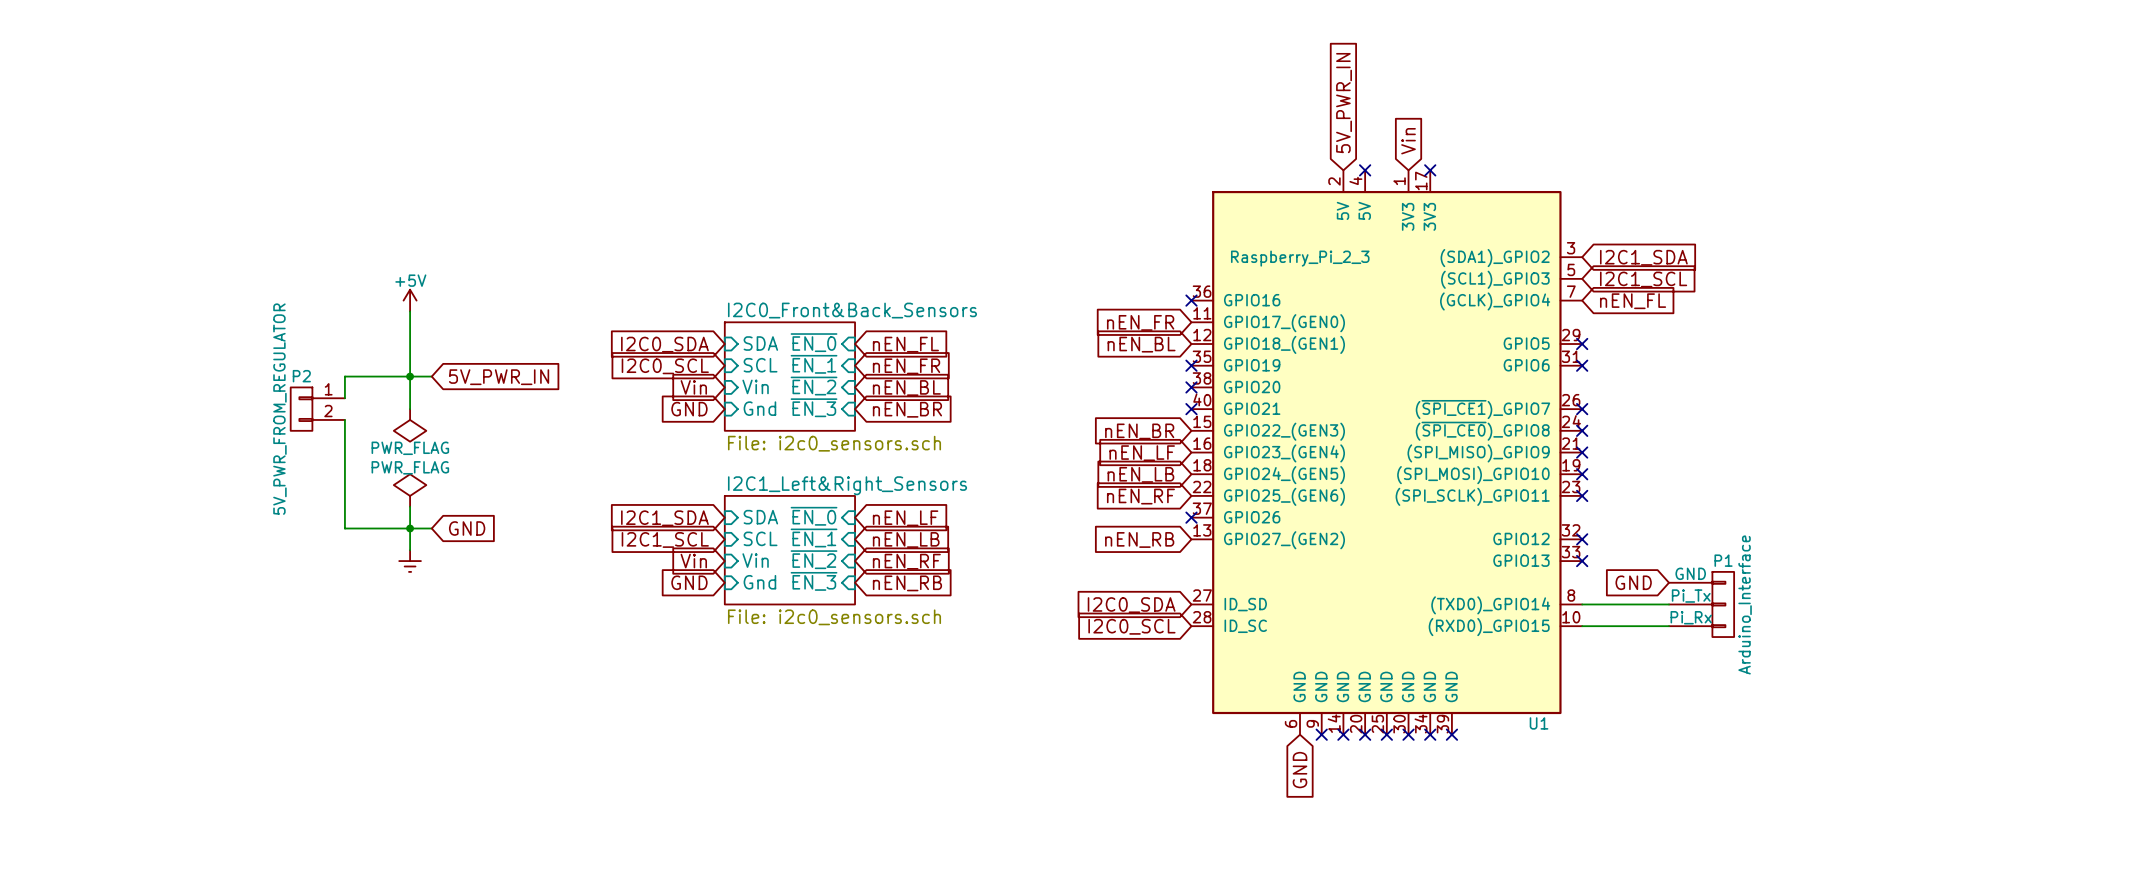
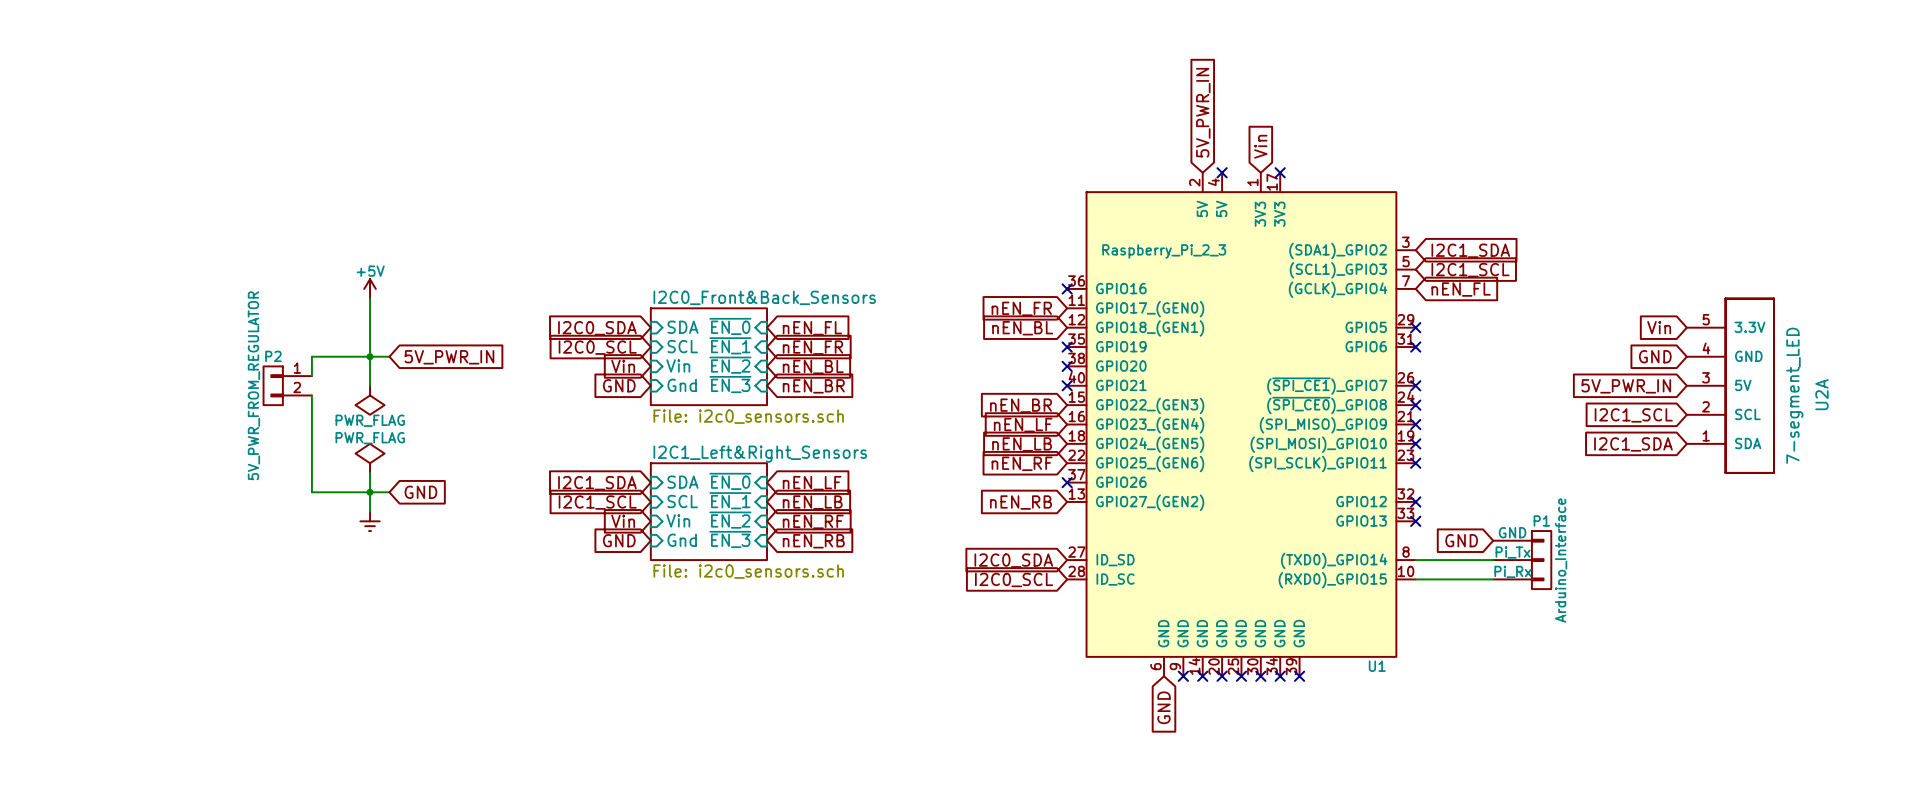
global label: none -> Vin (1659, 327)
global label: none -> GND (1655, 356)
global label: none -> 5V_PWR_IN (1626, 386)
U2A: none -> 7-segment_LED (1730, 385)
global label: none -> I2C1_SCL (1633, 415)
global label: none -> I2C1_SDA (1633, 444)

